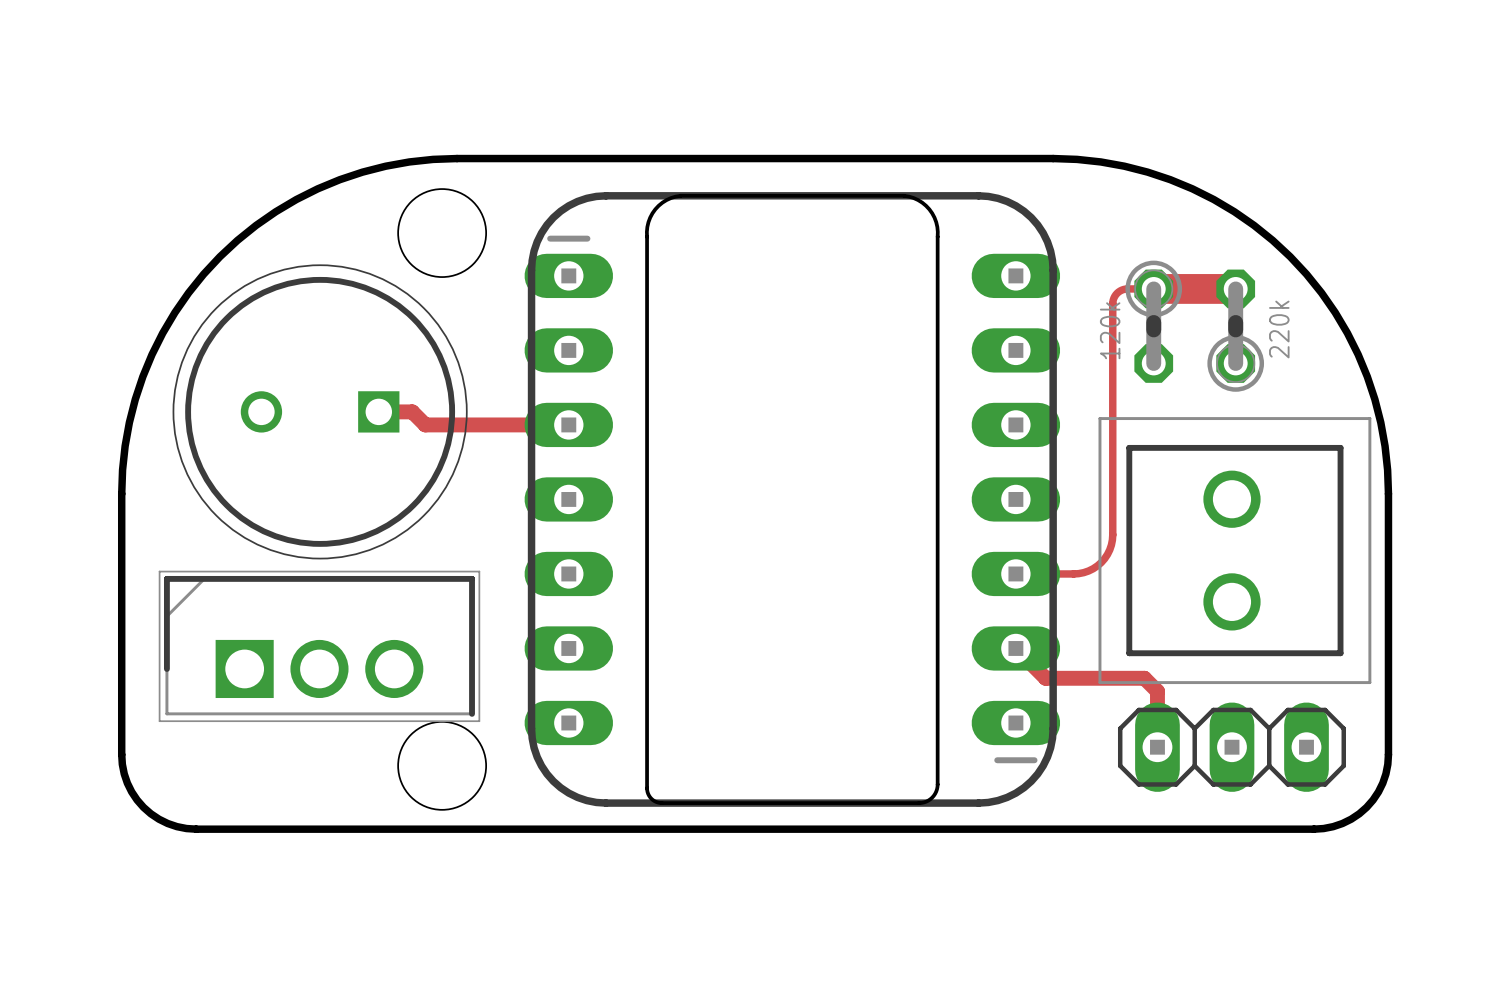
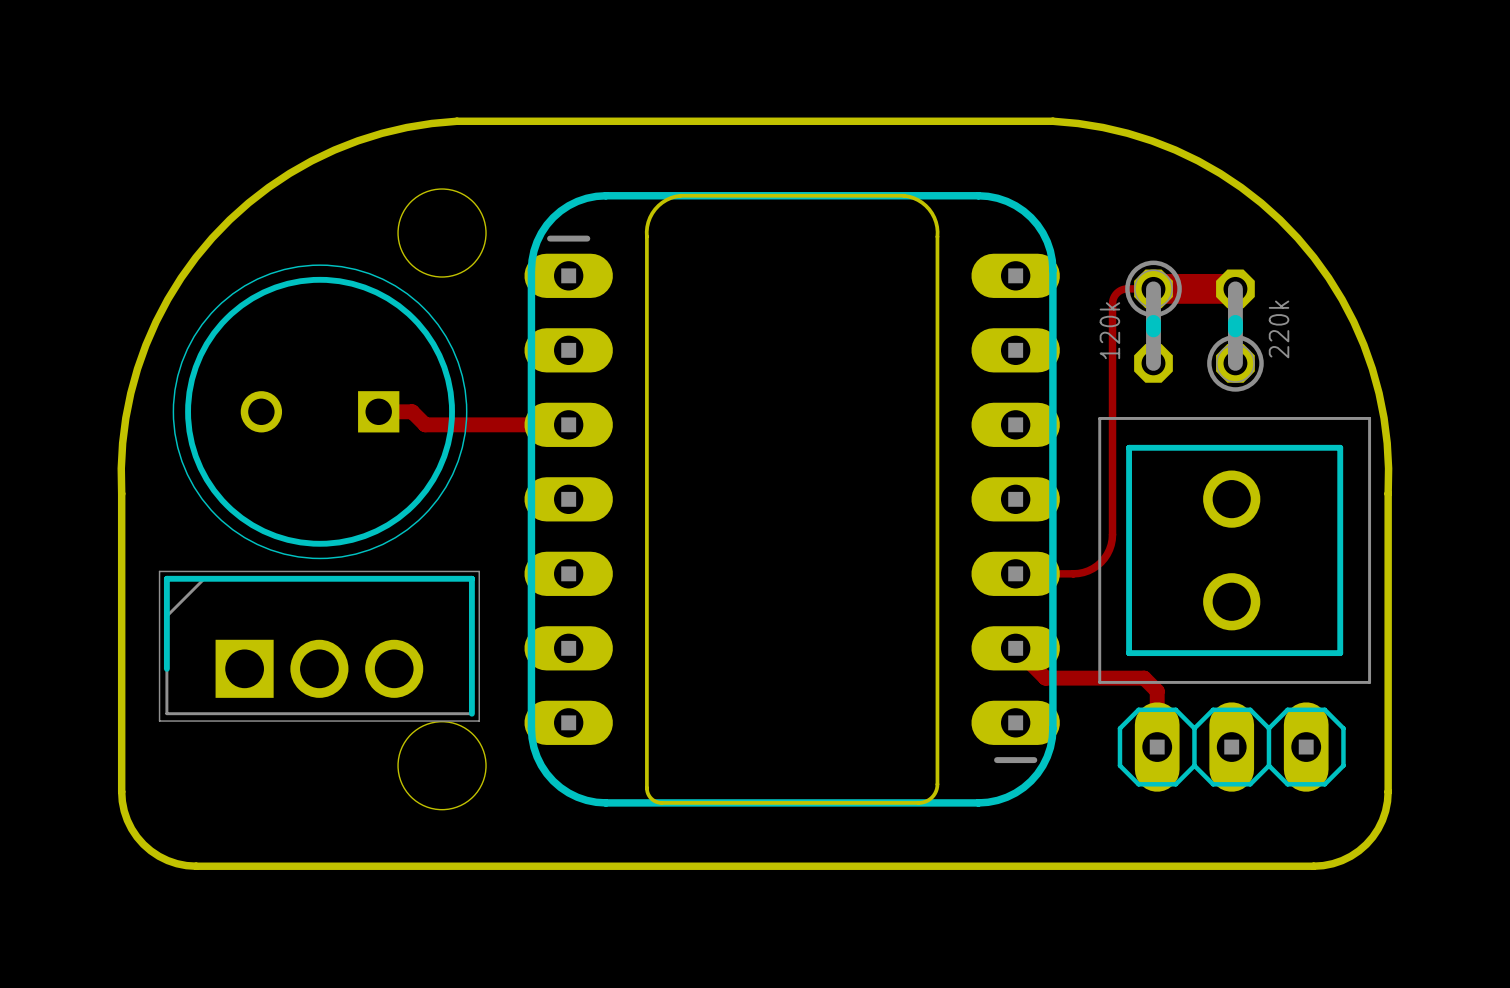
board edge: (121, 493) (125, 446) (129, 422) (135, 399) (152, 354) (162, 333) (188, 292) (219, 256) (256, 225) (296, 199) (317, 188) (362, 172) (385, 166) (409, 161) (457, 158) (1053, 158) (1100, 161) (1147, 172) (1170, 179) (1213, 199) (1254, 225) (1290, 256) (1321, 292) (1347, 333) (1358, 354) (1374, 399) (1385, 446) (1388, 493) -> (121, 493) (121, 468) (125, 418) (130, 393) (145, 345) (156, 321) (181, 277) (212, 238) (229, 219) (268, 187) (289, 173) (334, 150) (382, 133) (431, 123) (456, 121) (1052, 121) (1078, 123) (1127, 133) (1175, 150) (1220, 173) (1261, 203) (1297, 238) (1328, 277) (1353, 321) (1363, 345) (1379, 393) (1387, 443) (1388, 493)
board edge: (121, 754) (127, 783) (143, 807) (167, 823) (196, 829) (1313, 829) (1342, 823) (1366, 807) (1382, 783) (1388, 754) -> (121, 754) (122, 801) (131, 828) (143, 844) (158, 856) (176, 863) (196, 866) (1323, 865) (1342, 860) (1359, 850) (1378, 828) (1387, 801) (1388, 754)

